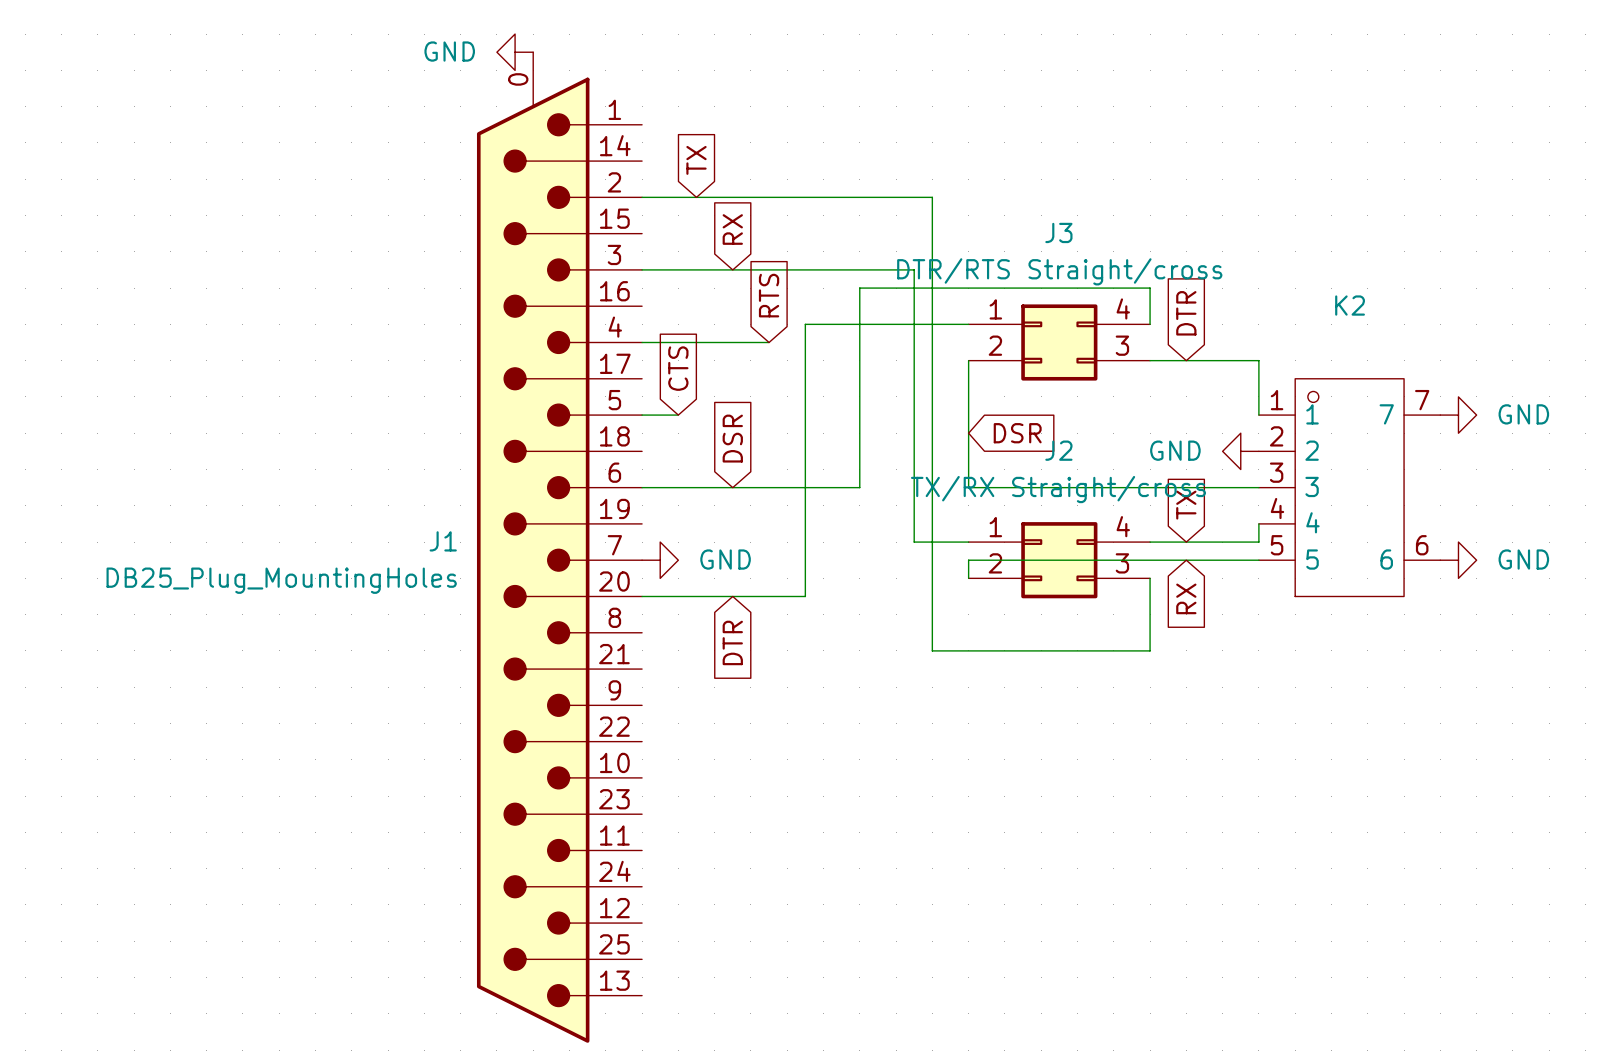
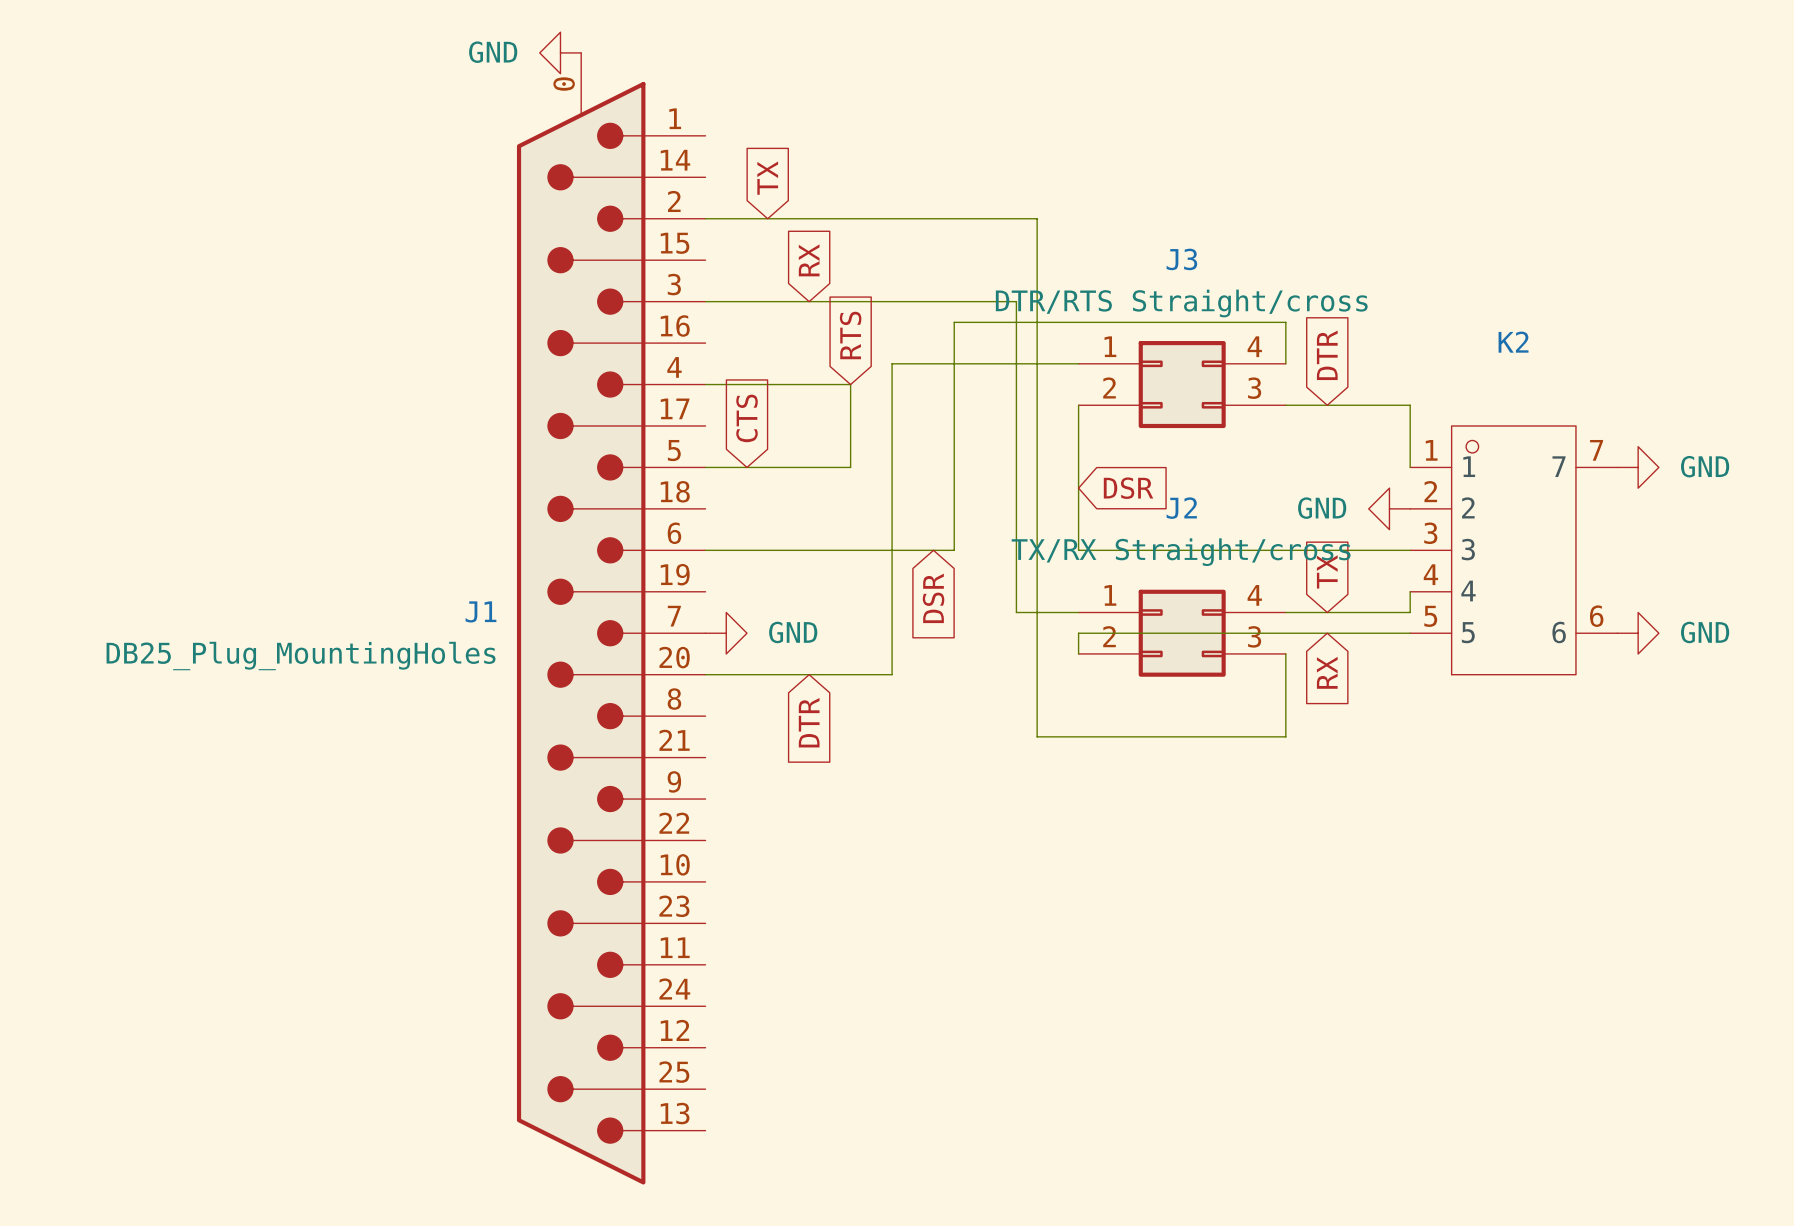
wire: none -> (850, 384) (850, 467) (746, 467)
global label rotation: 0° (732, 438) -> 180° (933, 598)
global label position: DSR (732, 438) -> DSR (933, 598)

